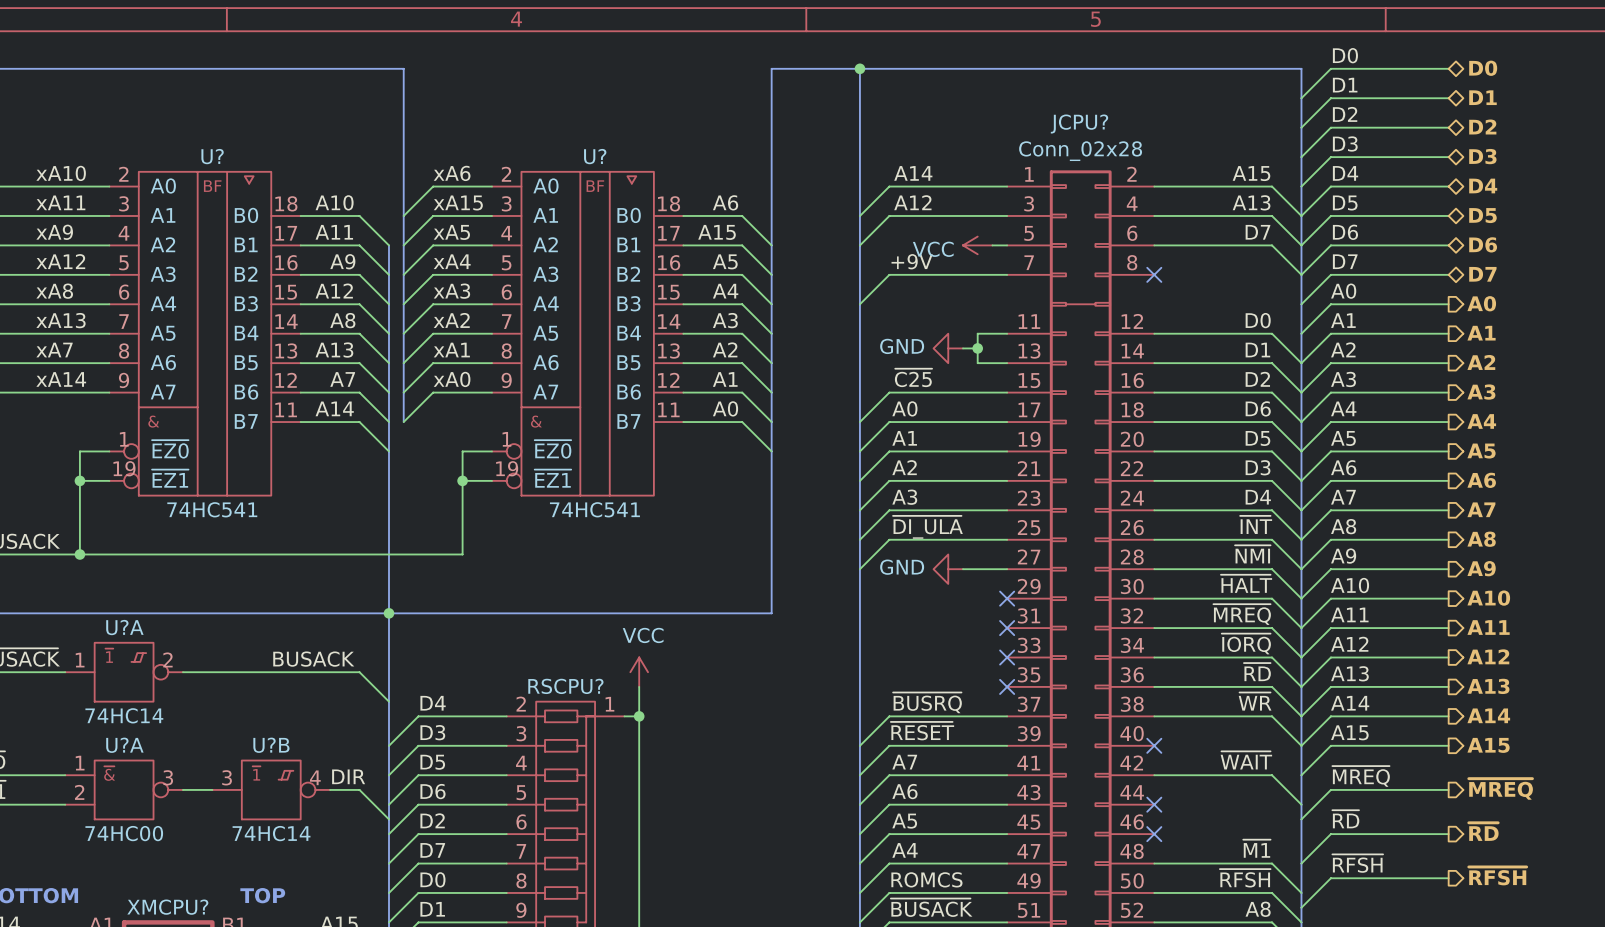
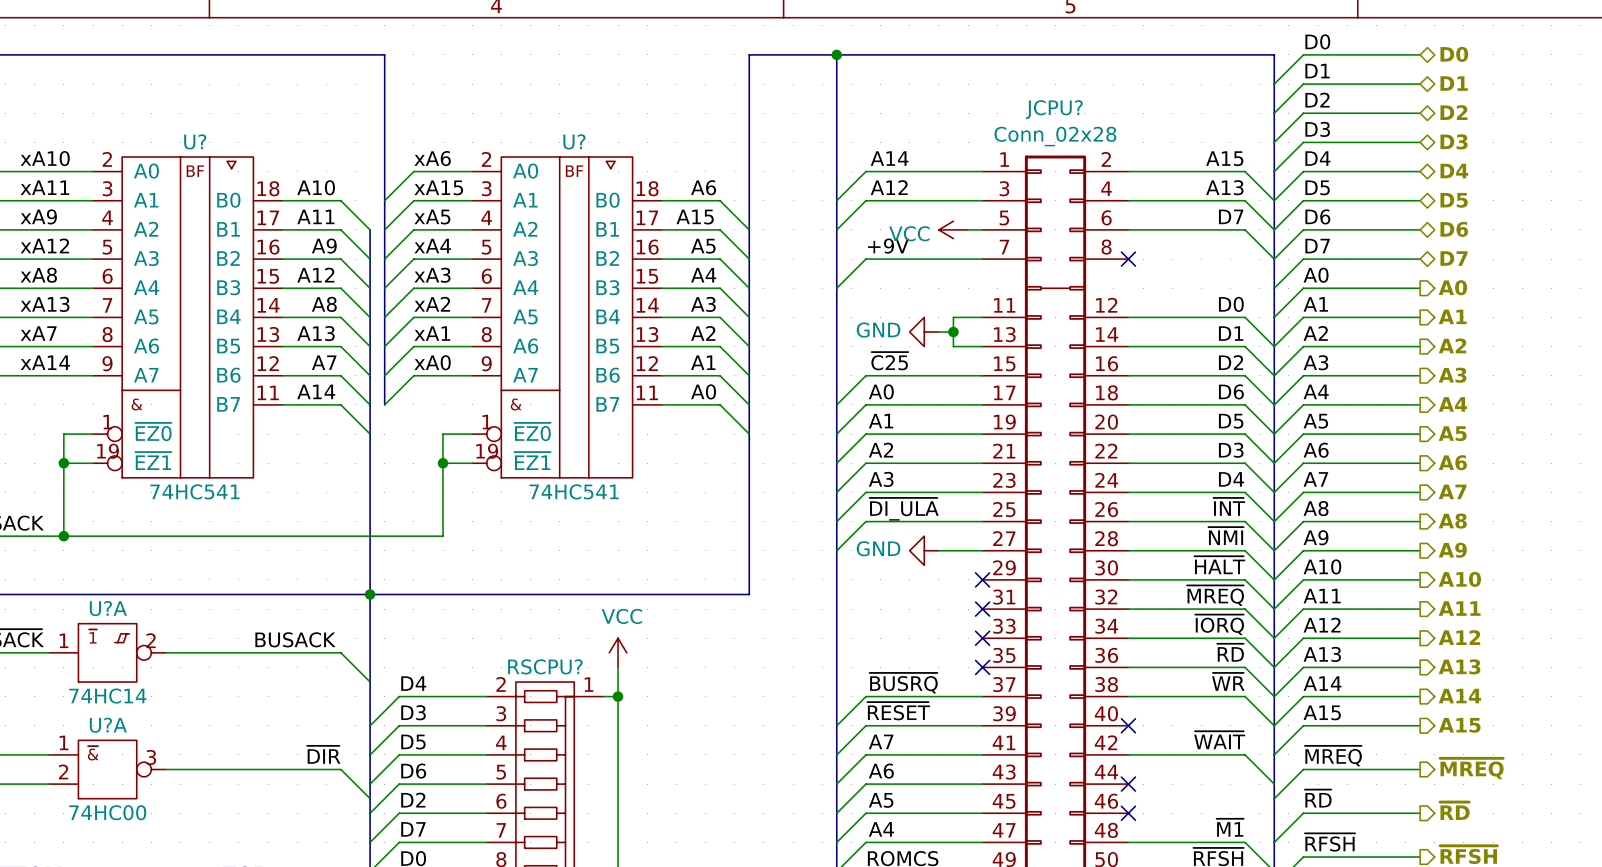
label: DIR (348, 776) -> ~{DIR} (323, 754)
wire: none -> (195, 769) (311, 769)
U?B: 74HC14 (271, 789) -> none

